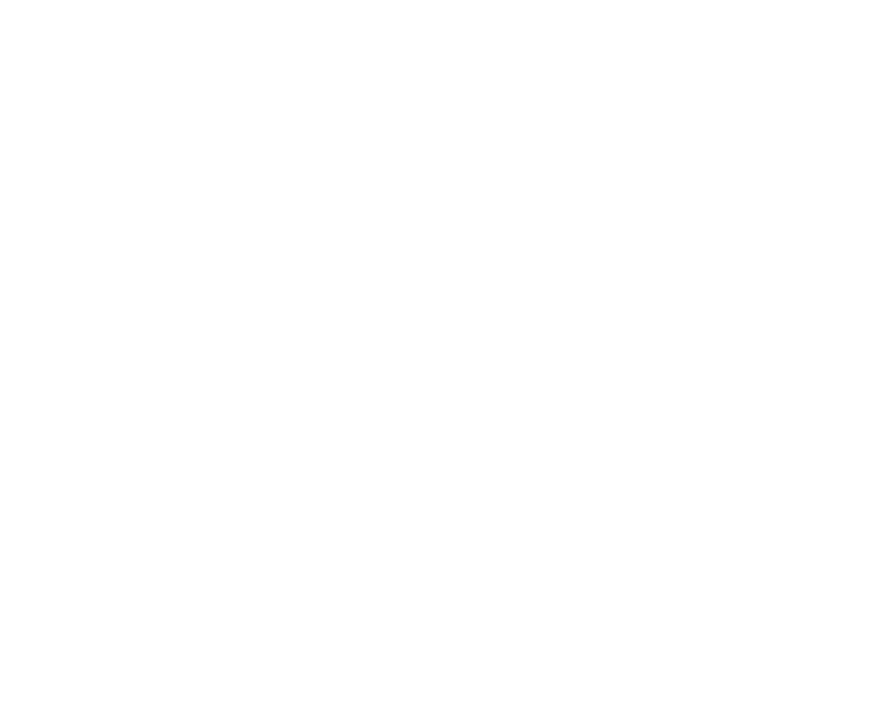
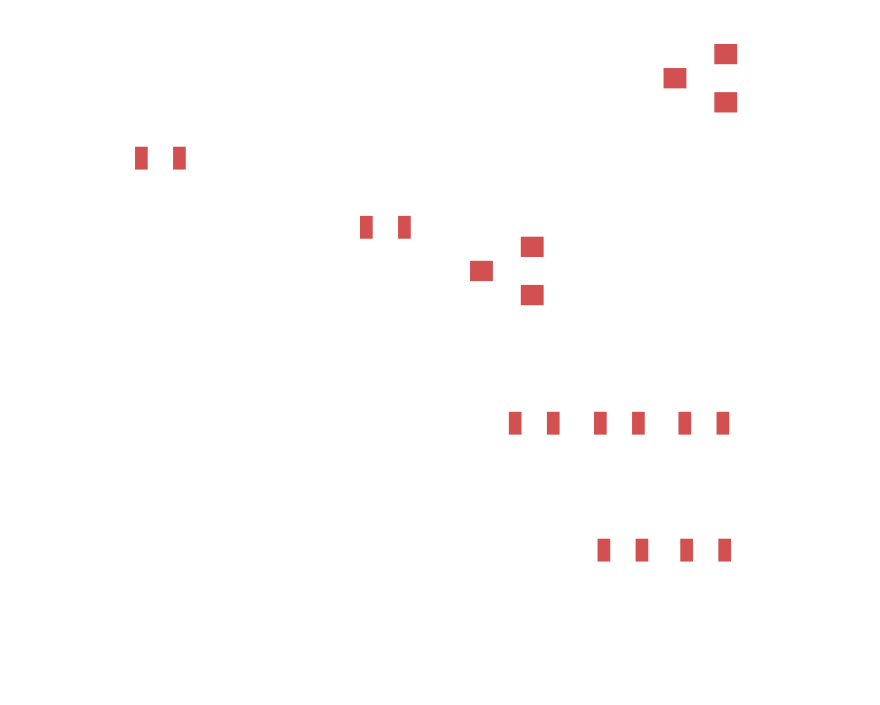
part: none -> (700, 78)
part: none -> (160, 158)
part: none -> (385, 227)
part: none -> (506, 270)
part: none -> (534, 423)
part: none -> (619, 423)
part: none -> (703, 423)
part: none -> (622, 550)
part: none -> (705, 550)

